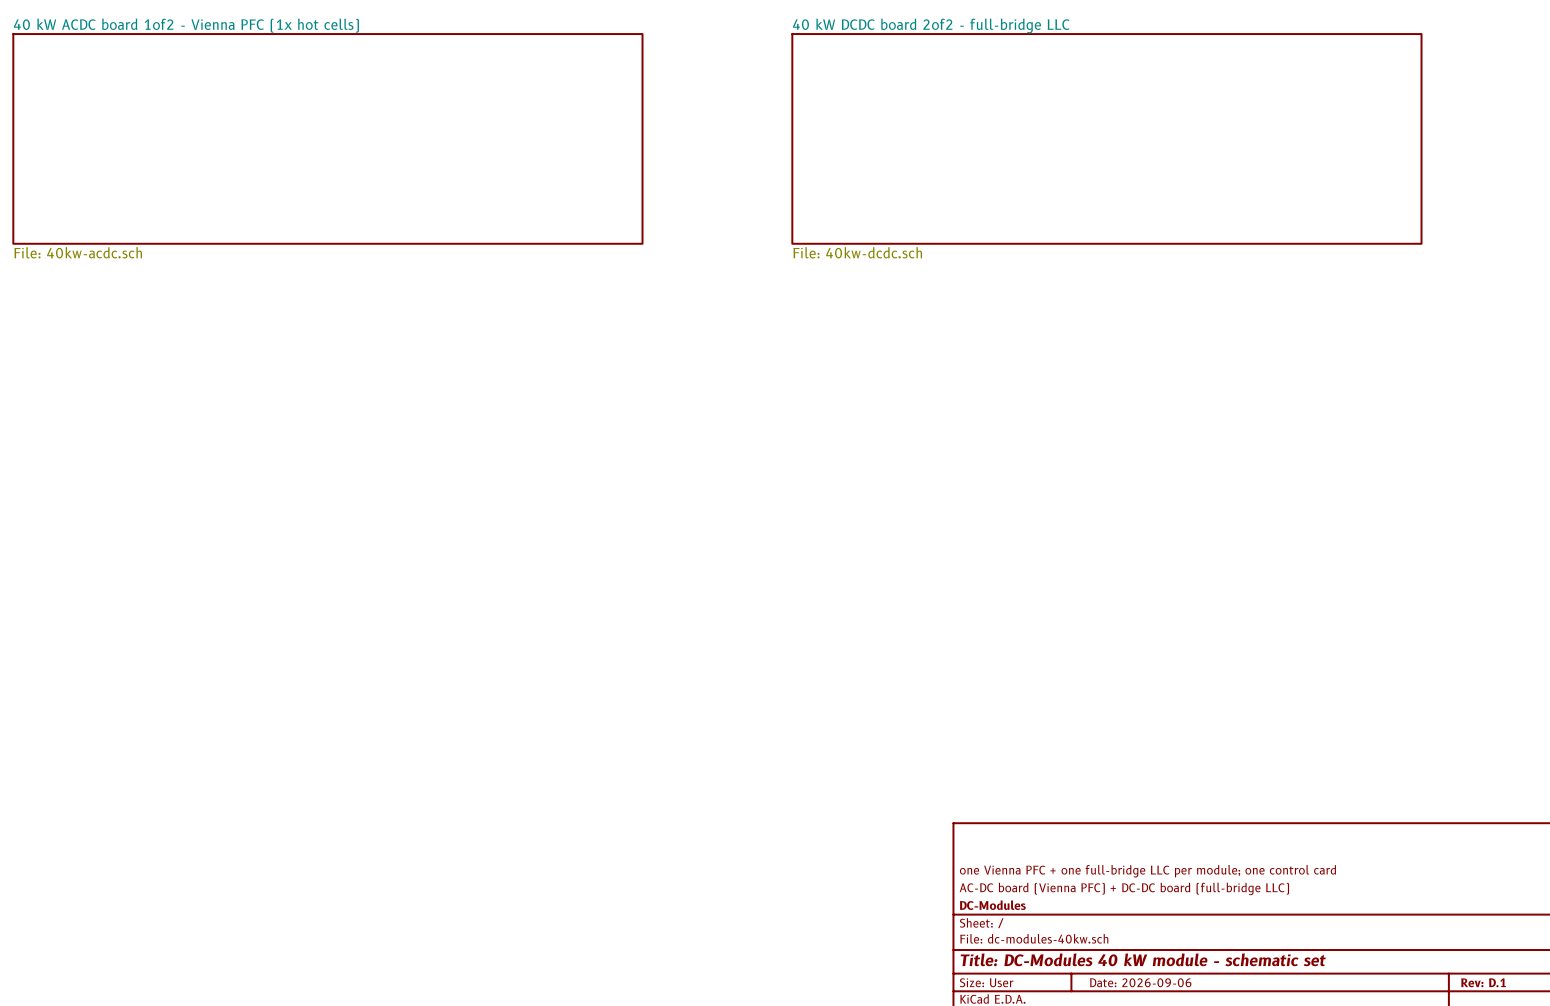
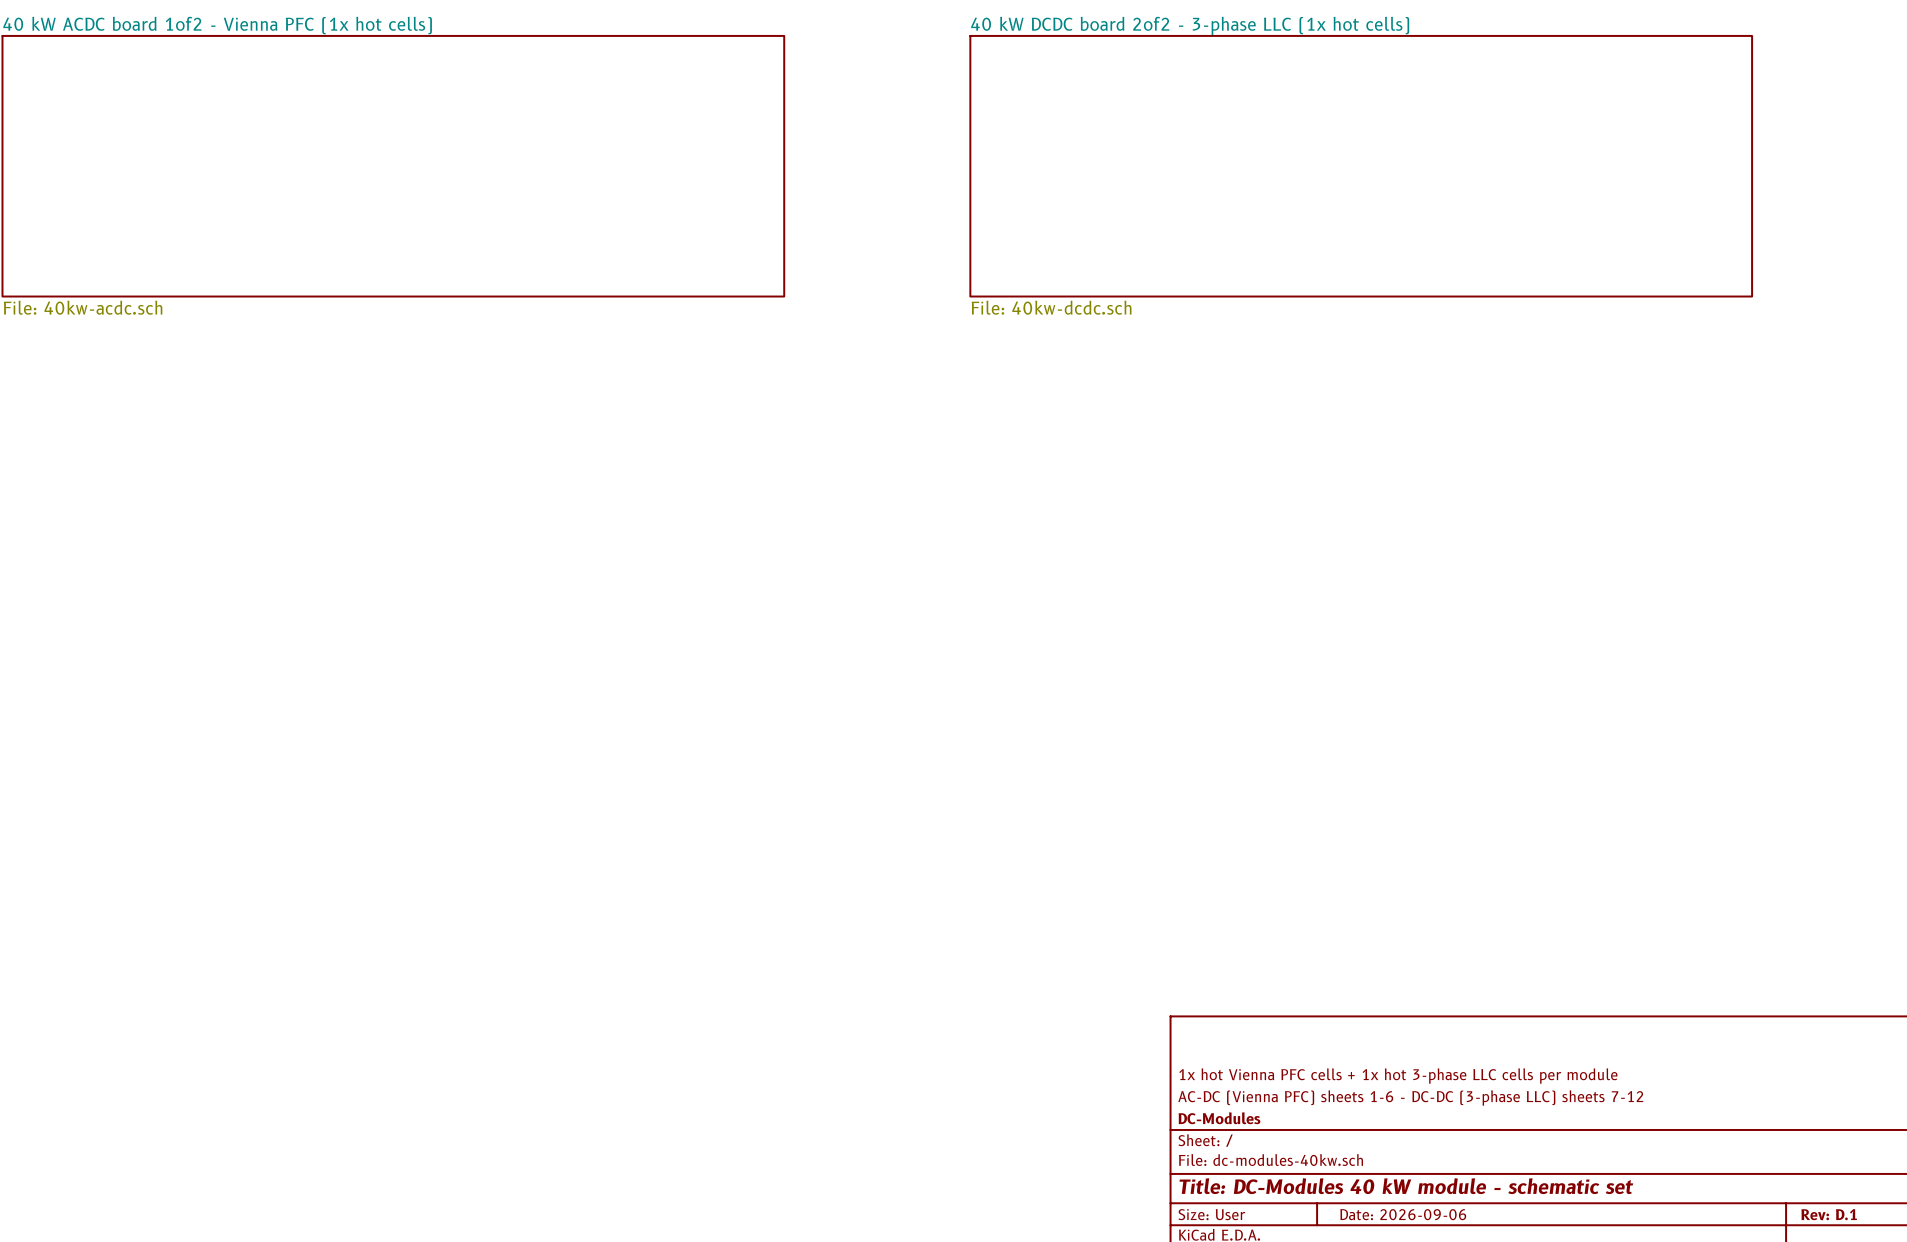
sheet 40 kW DCDC board 2of2 - full-bridge LLC name: 40 kW DCDC board 2of2 - full-bridge LLC (931, 26) -> 40 kW DCDC board 2of2 - 3-phase LLC (1x hot cells) (1190, 25)
title block: one Vienna PFC + one full-bridge LLC per module; one control card (1147, 871) -> 1x hot Vienna PFC cells + 1x hot 3-phase LLC cells per module (1398, 1076)
title block: AC-DC board (Vienna PFC) + DC-DC board (full-bridge LLC) (1124, 888) -> AC-DC (Vienna PFC) sheets 1-6 - DC-DC (3-phase LLC) sheets 7-12 (1410, 1098)

